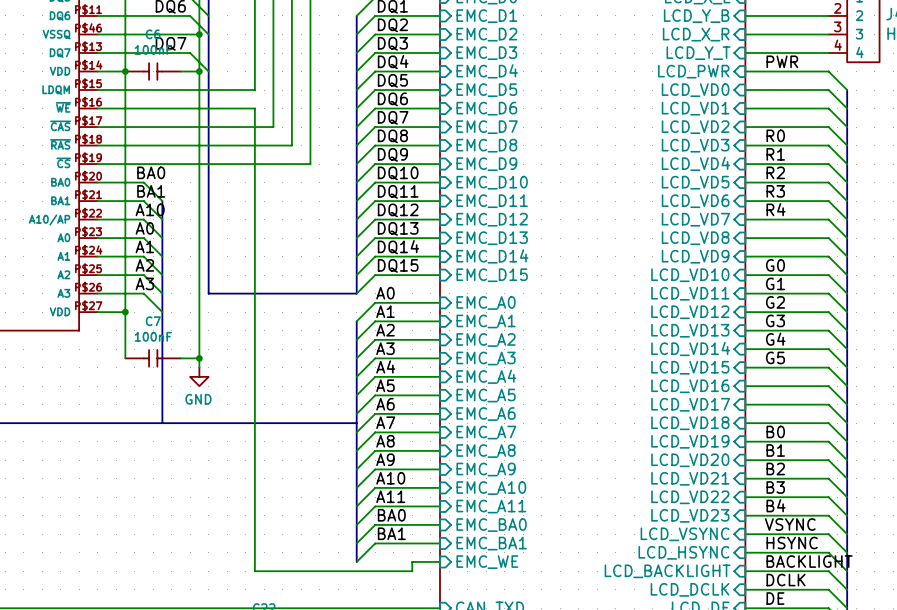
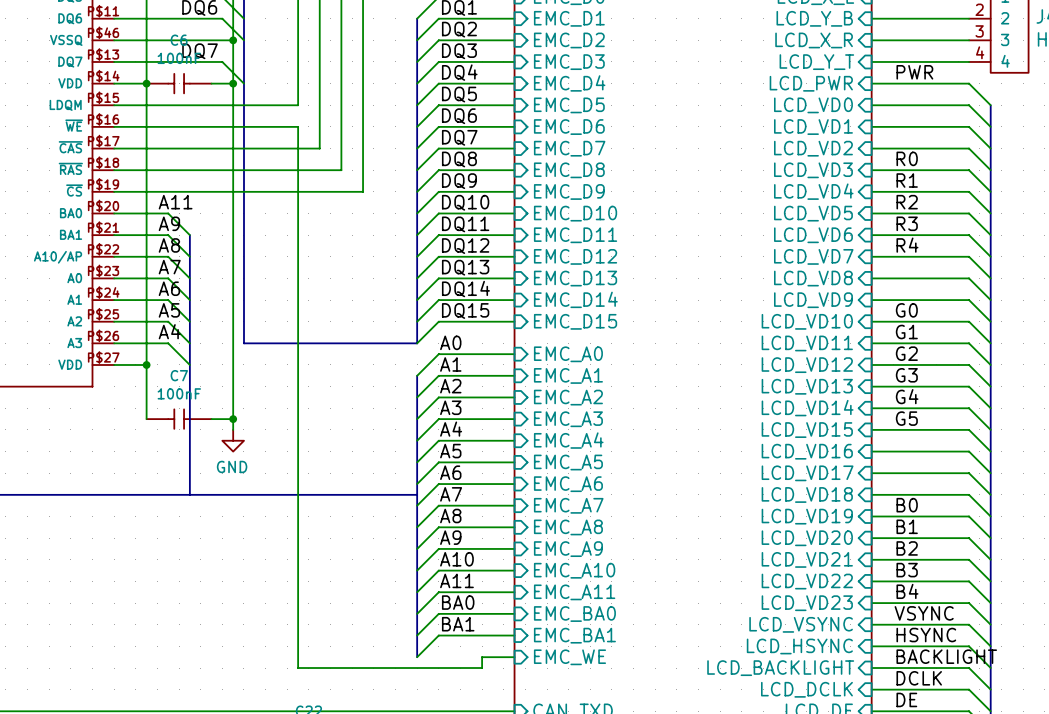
label: BA0 (151, 172) -> A11 (175, 202)
label: BA1 (151, 191) -> A9 (169, 223)
label: A10 (150, 209) -> A8 (169, 245)
label: A0 (144, 228) -> A7 (169, 267)
label: A1 (144, 246) -> A6 (169, 288)
label: A2 (144, 265) -> A5 (169, 310)
label: A3 (144, 283) -> A4 (169, 331)

